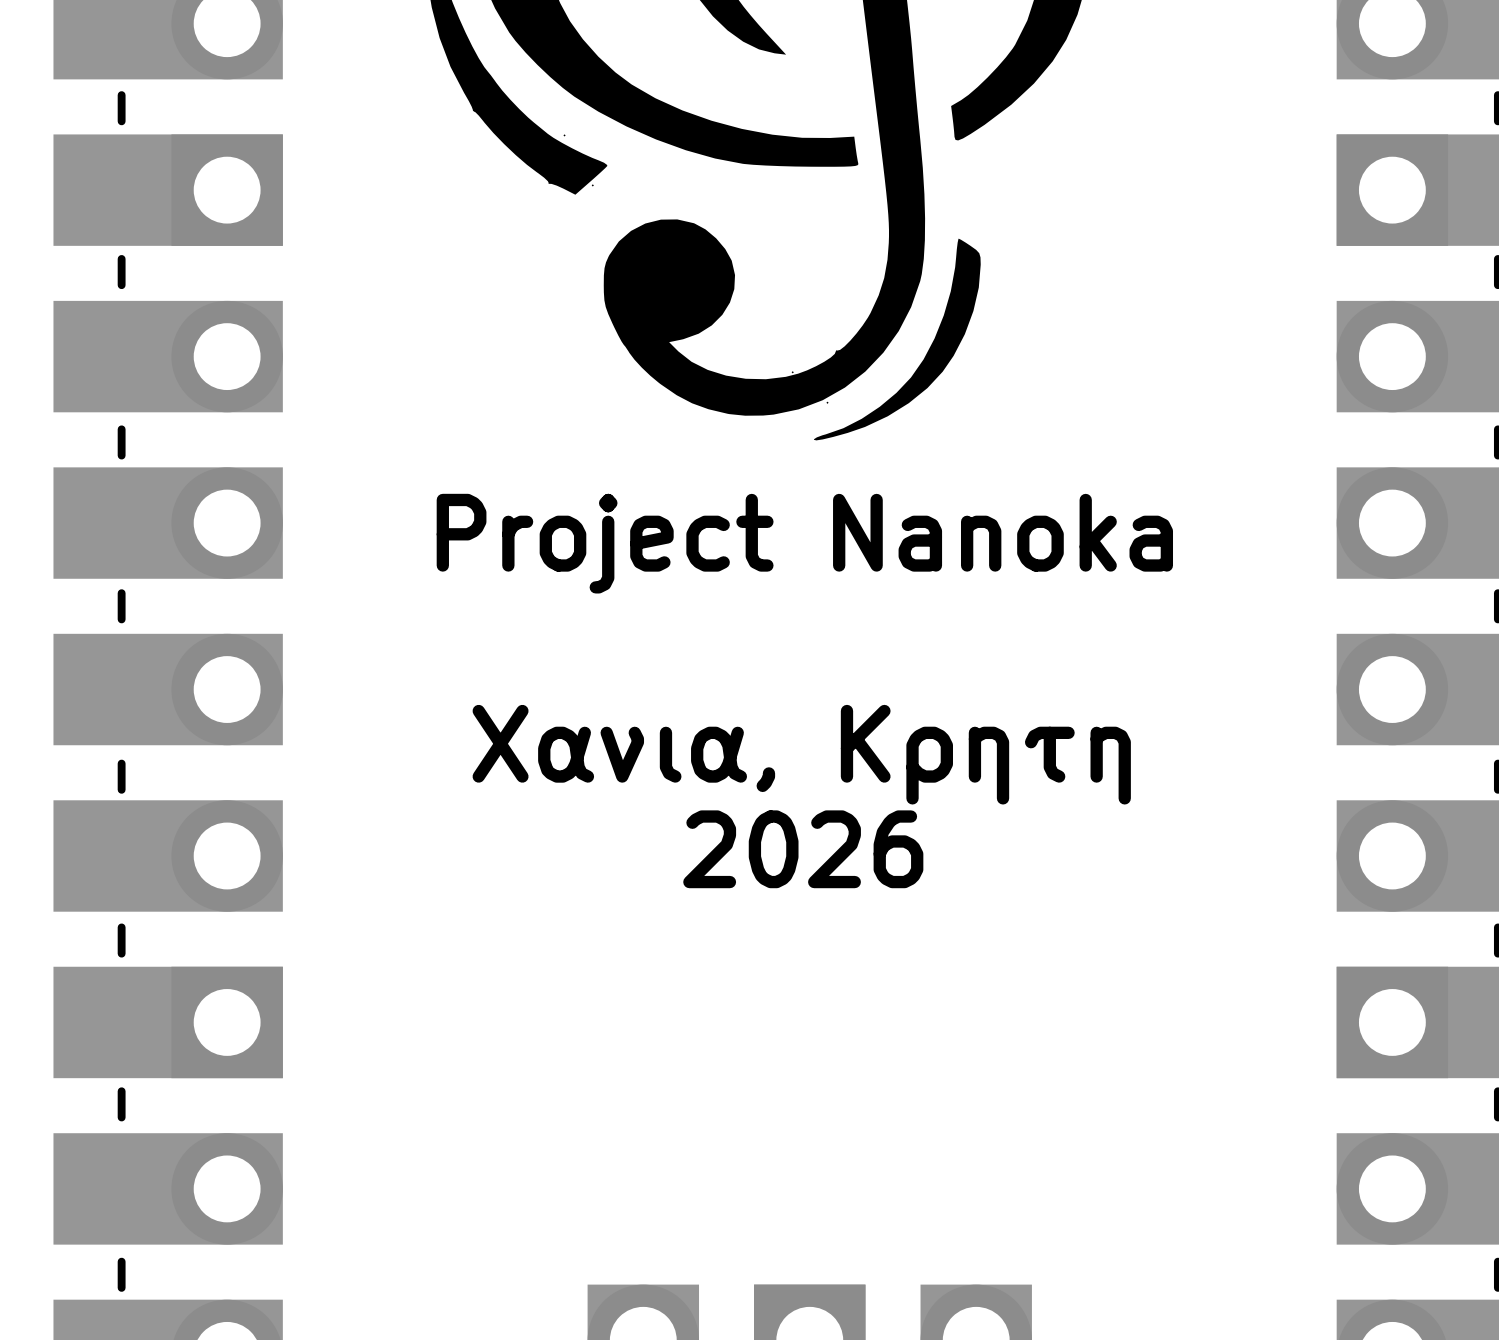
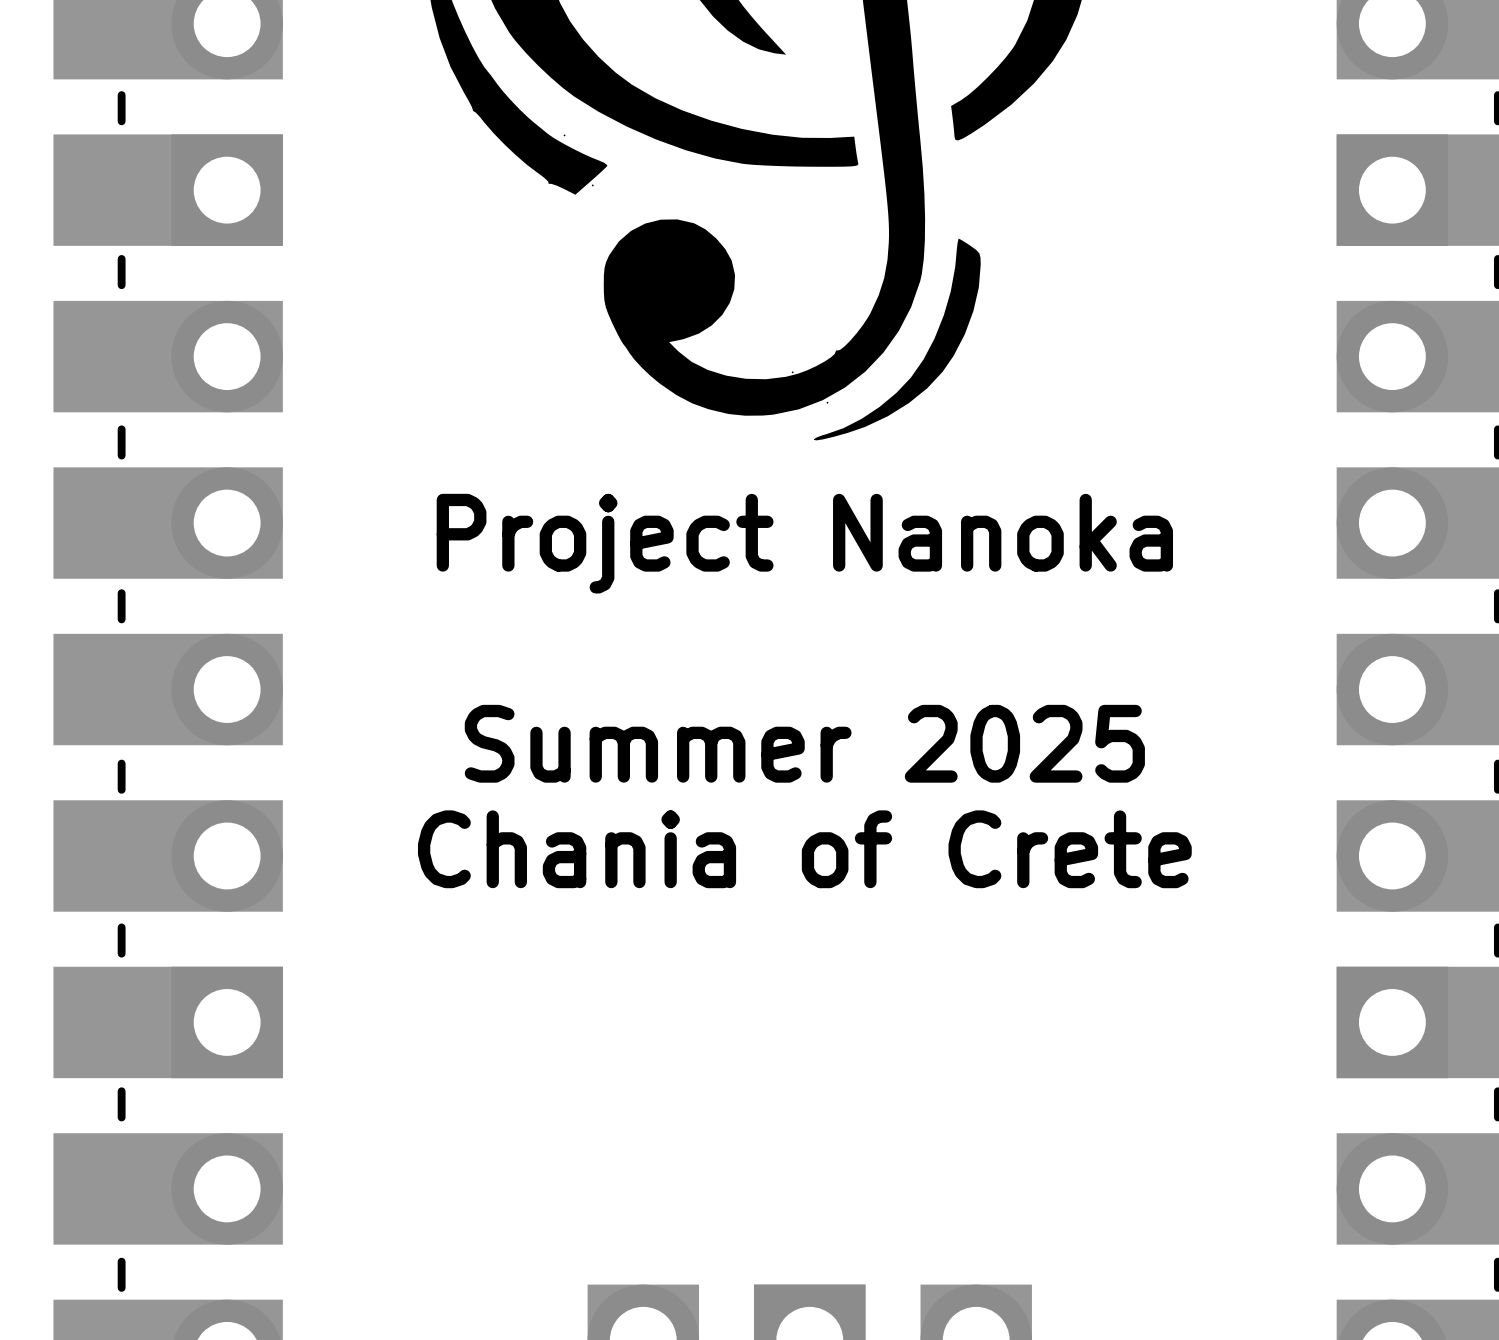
text: Χανια, Κρητη (801, 754) -> Summer 2025 (804, 743)
text: 2026 (803, 849) -> Chania of Crete (804, 849)

